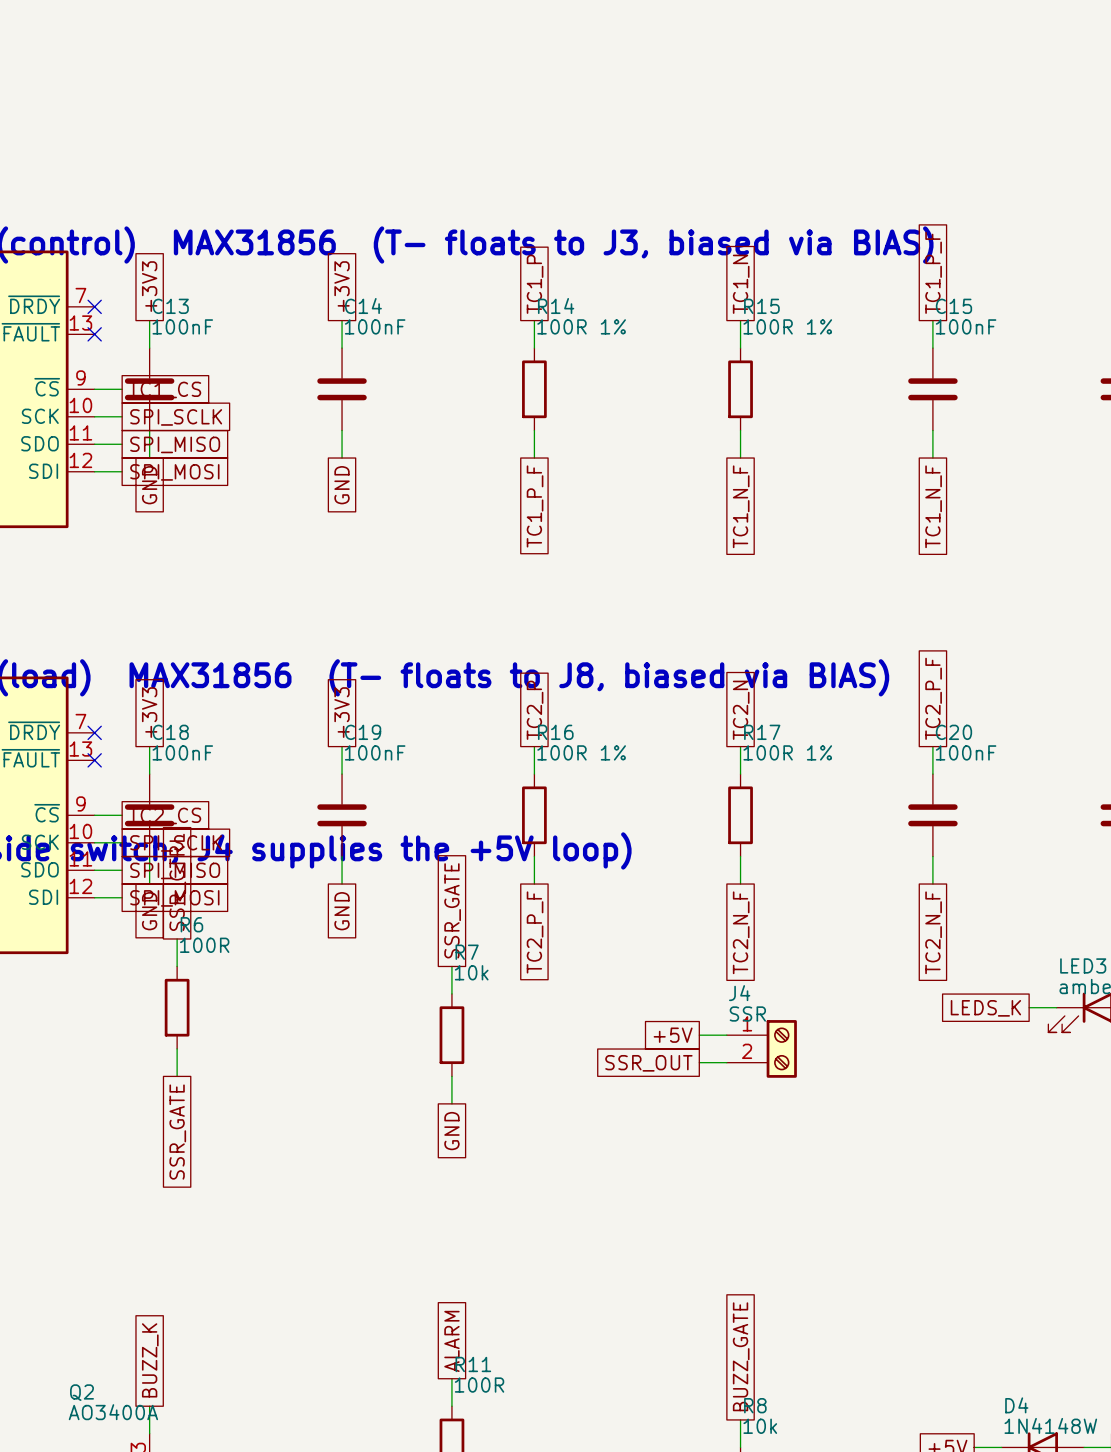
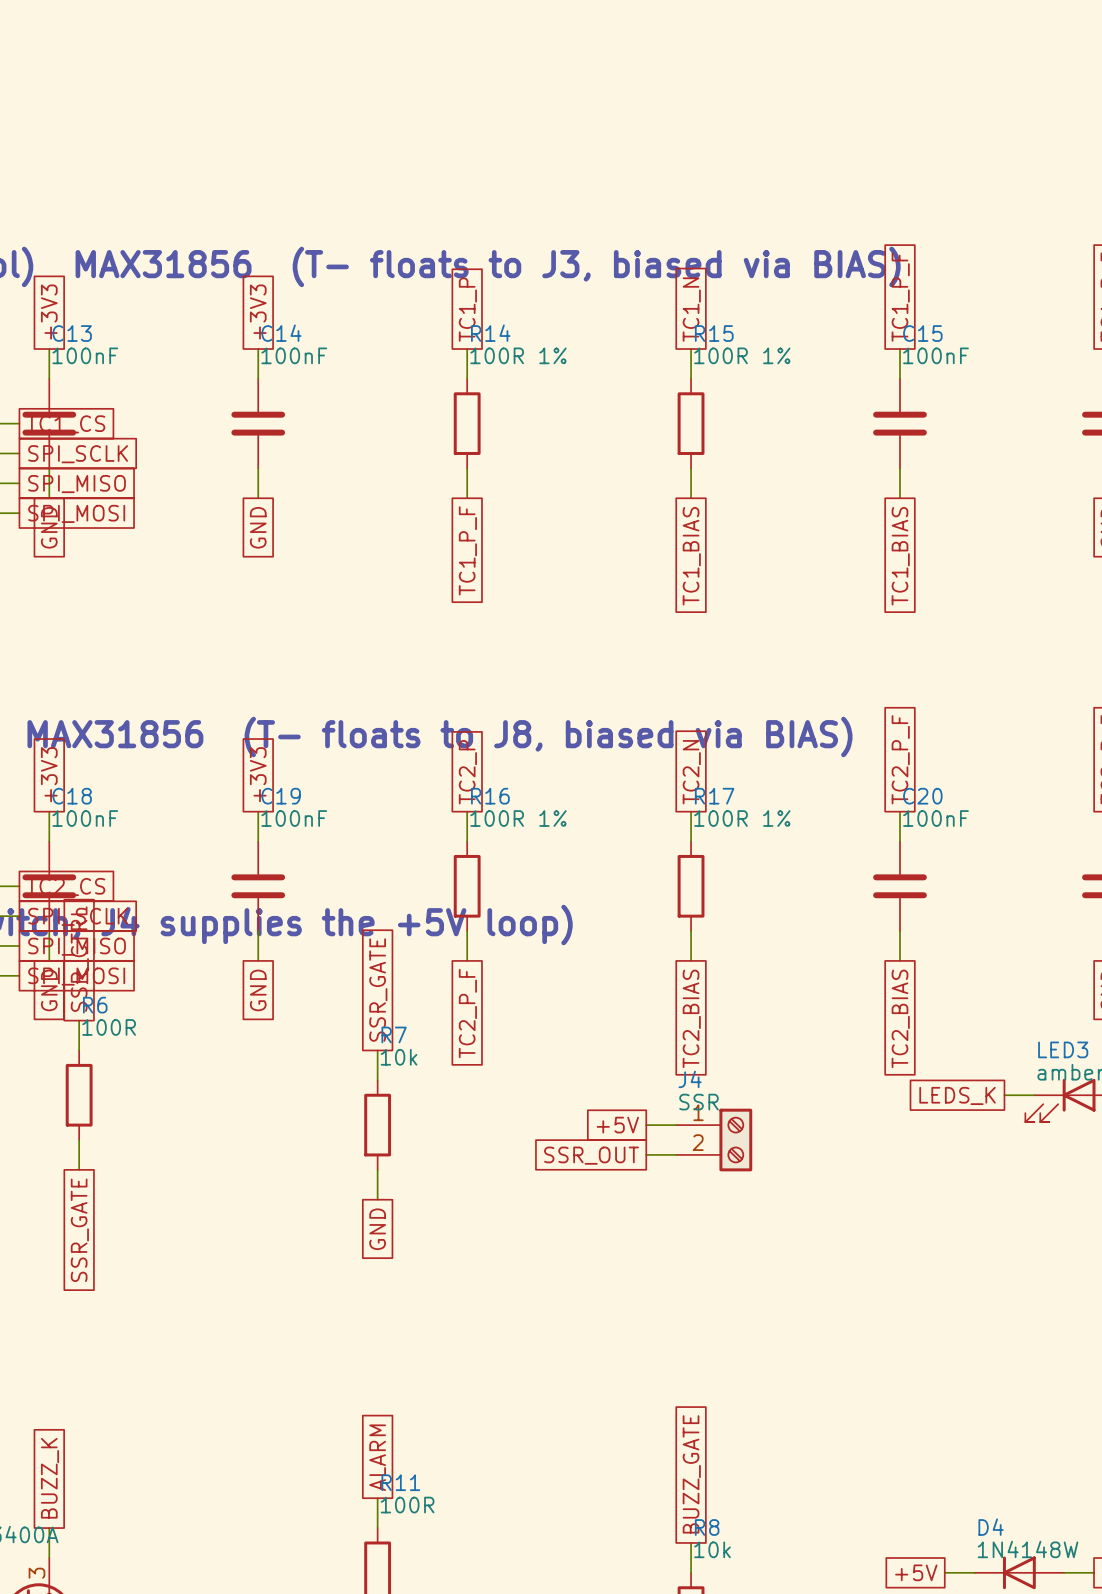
global label: TC1_N_F (741, 506) -> TC1_BIAS (691, 556)
global label: TC1_N_F (933, 506) -> TC1_BIAS (900, 556)
global label: TC2_N_F (741, 932) -> TC2_BIAS (691, 1018)
global label: TC2_N_F (933, 932) -> TC2_BIAS (900, 1018)

